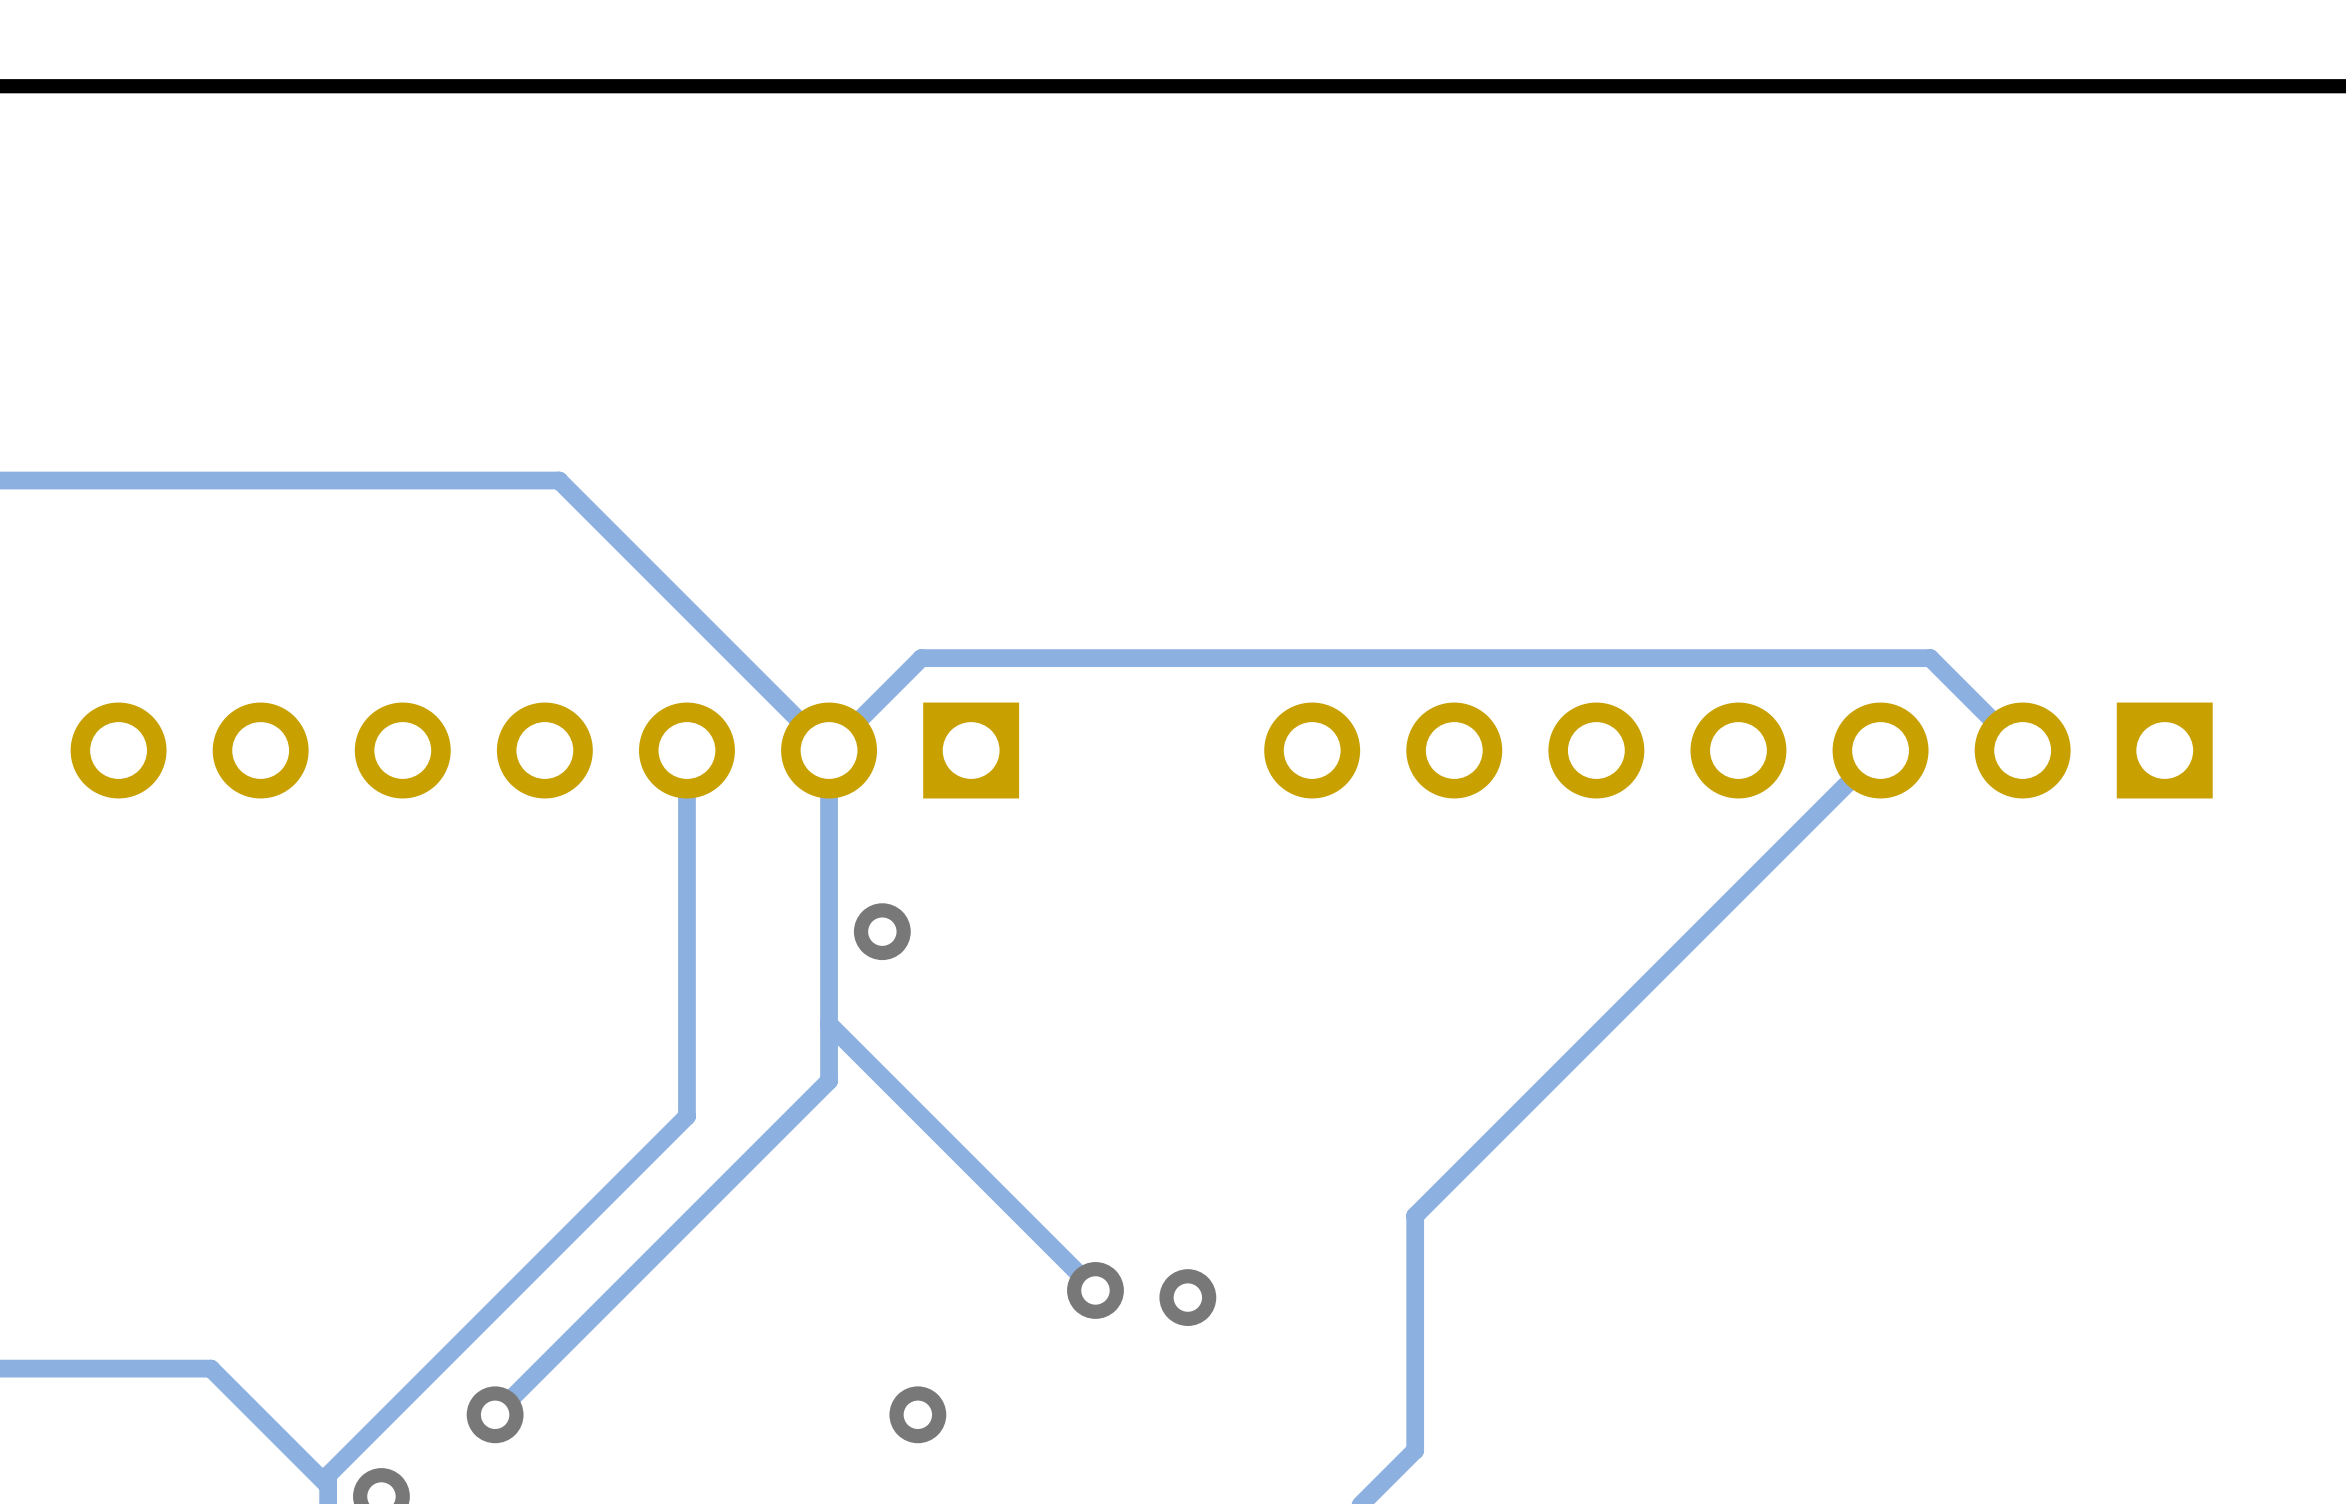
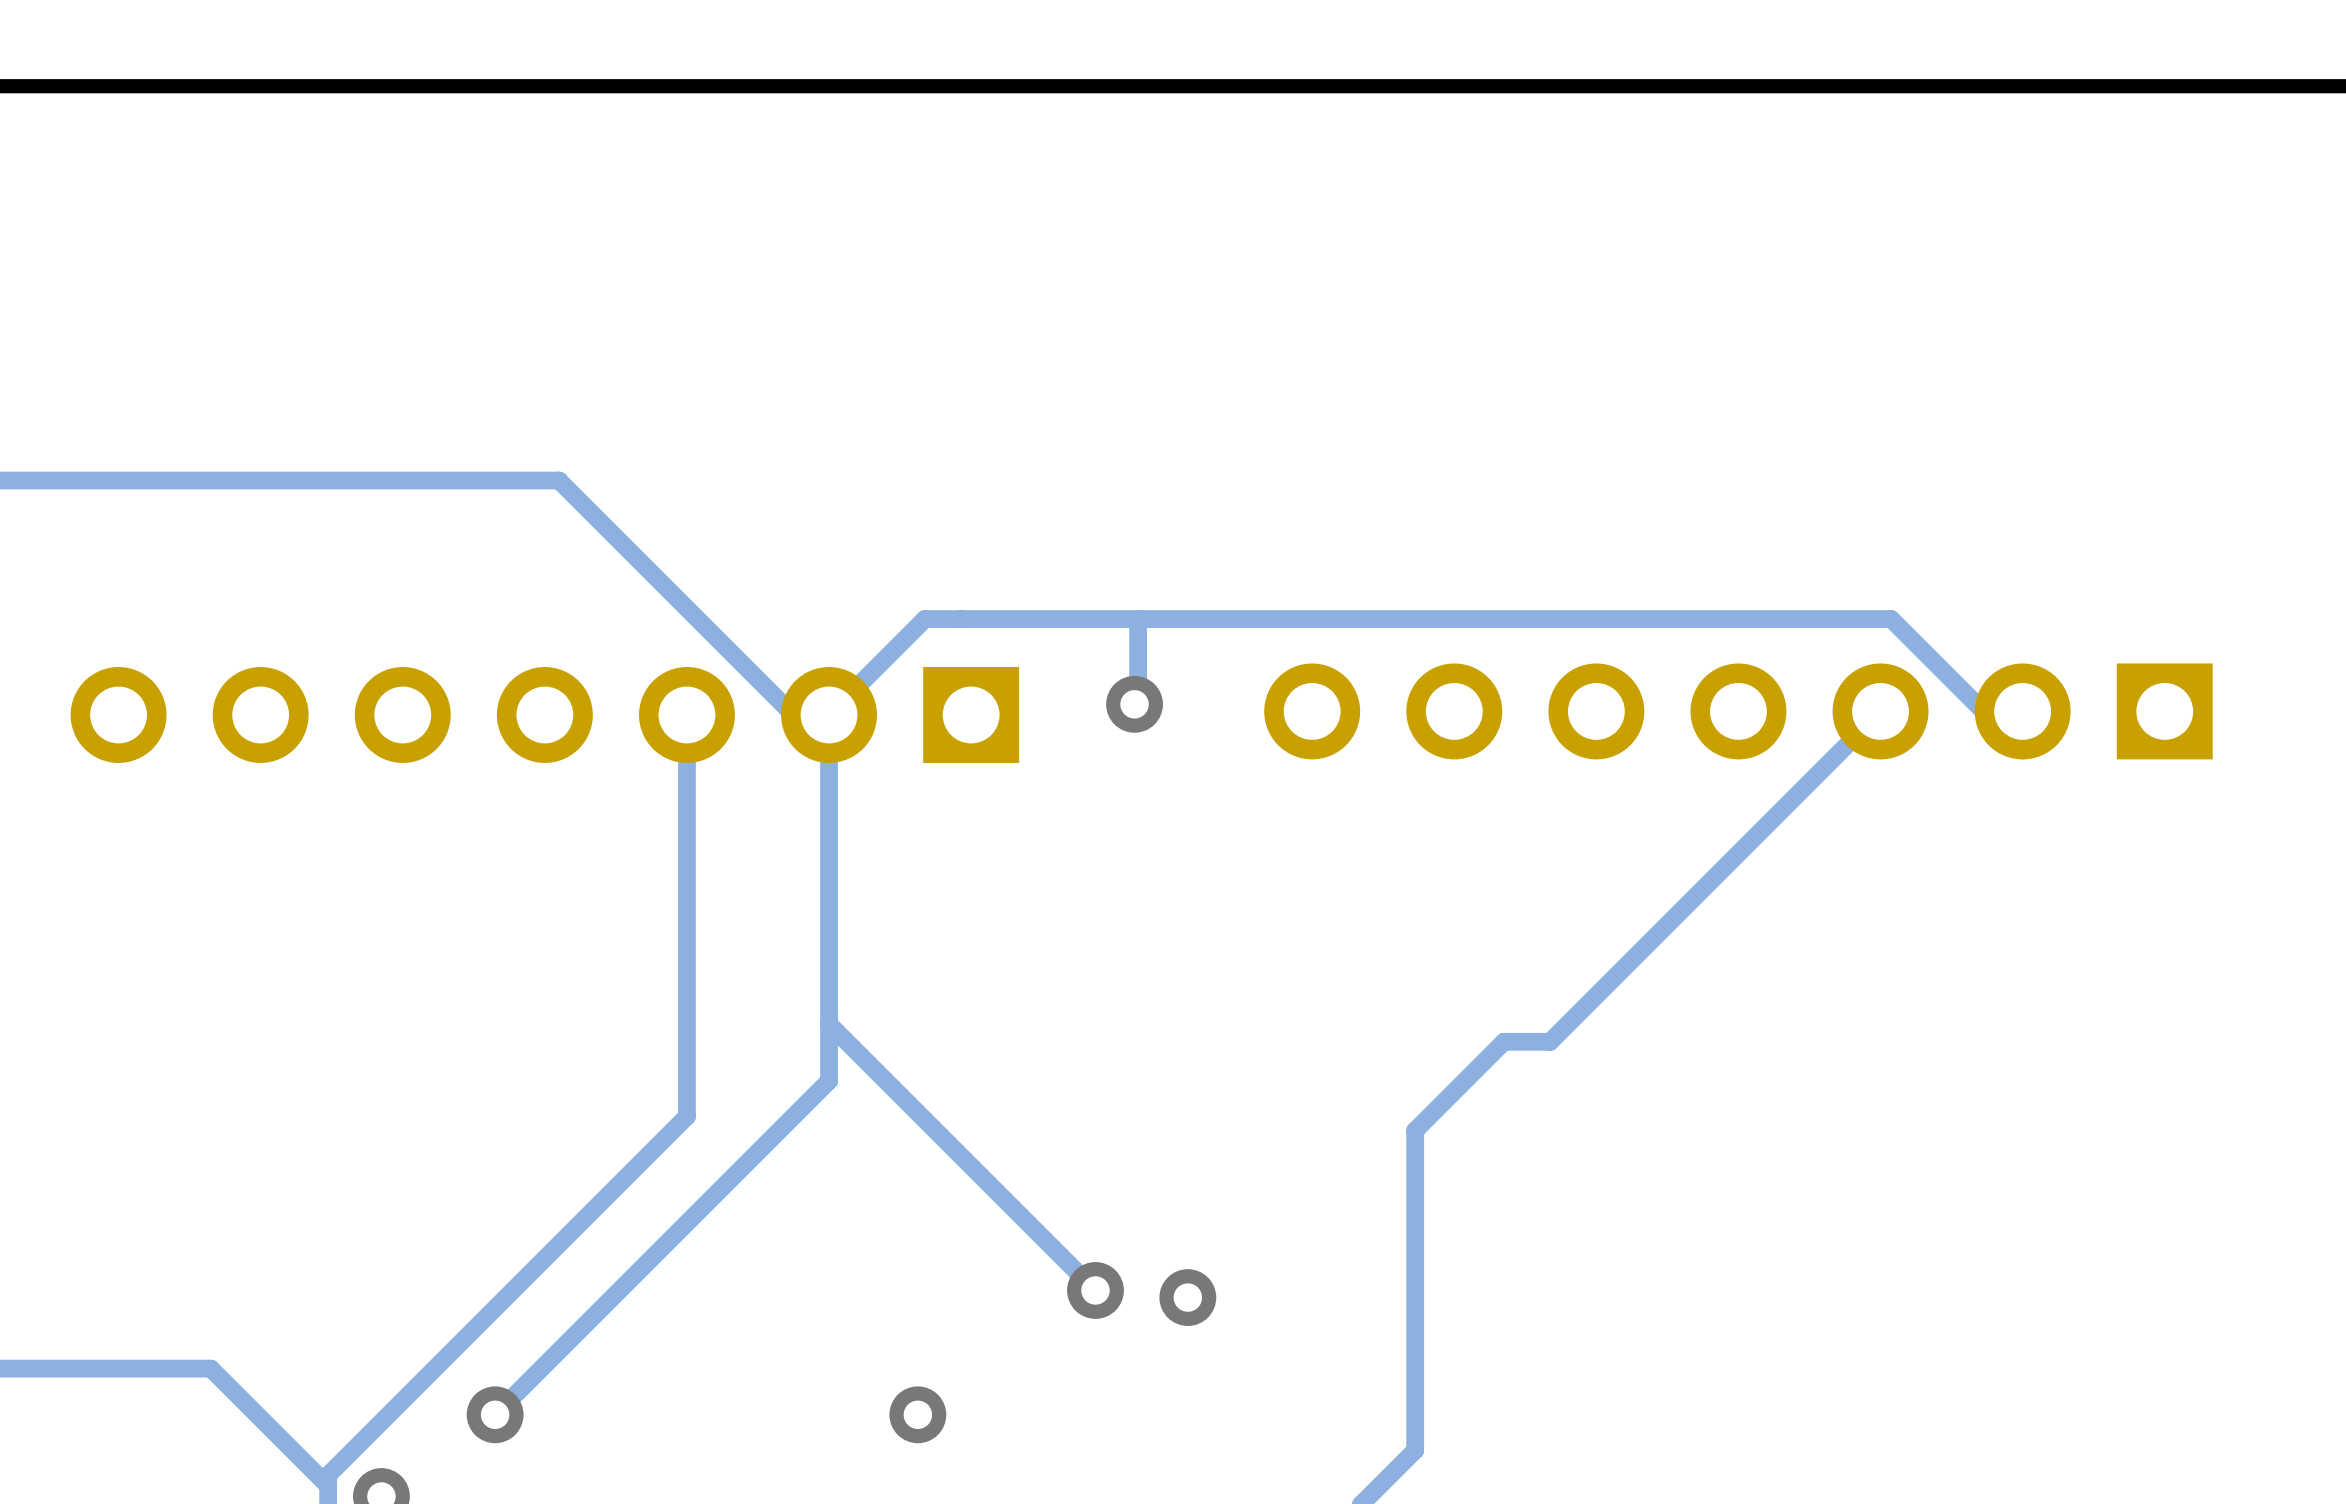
track: none -> (1138, 619) (1138, 700) (1134, 704)
track: (1930, 658) (921, 658) (829, 750) (793, 714) -> (1930, 658) (1891, 619) (924, 619) (829, 714)
part position: (544, 750) -> (544, 714)
part position: (1738, 750) -> (1738, 711)
track: (1880, 750) (1415, 1215) -> (1880, 711) (1550, 1041) (1504, 1041) (1415, 1130) (1415, 1215)
via position: (882, 931) -> (1134, 704)

